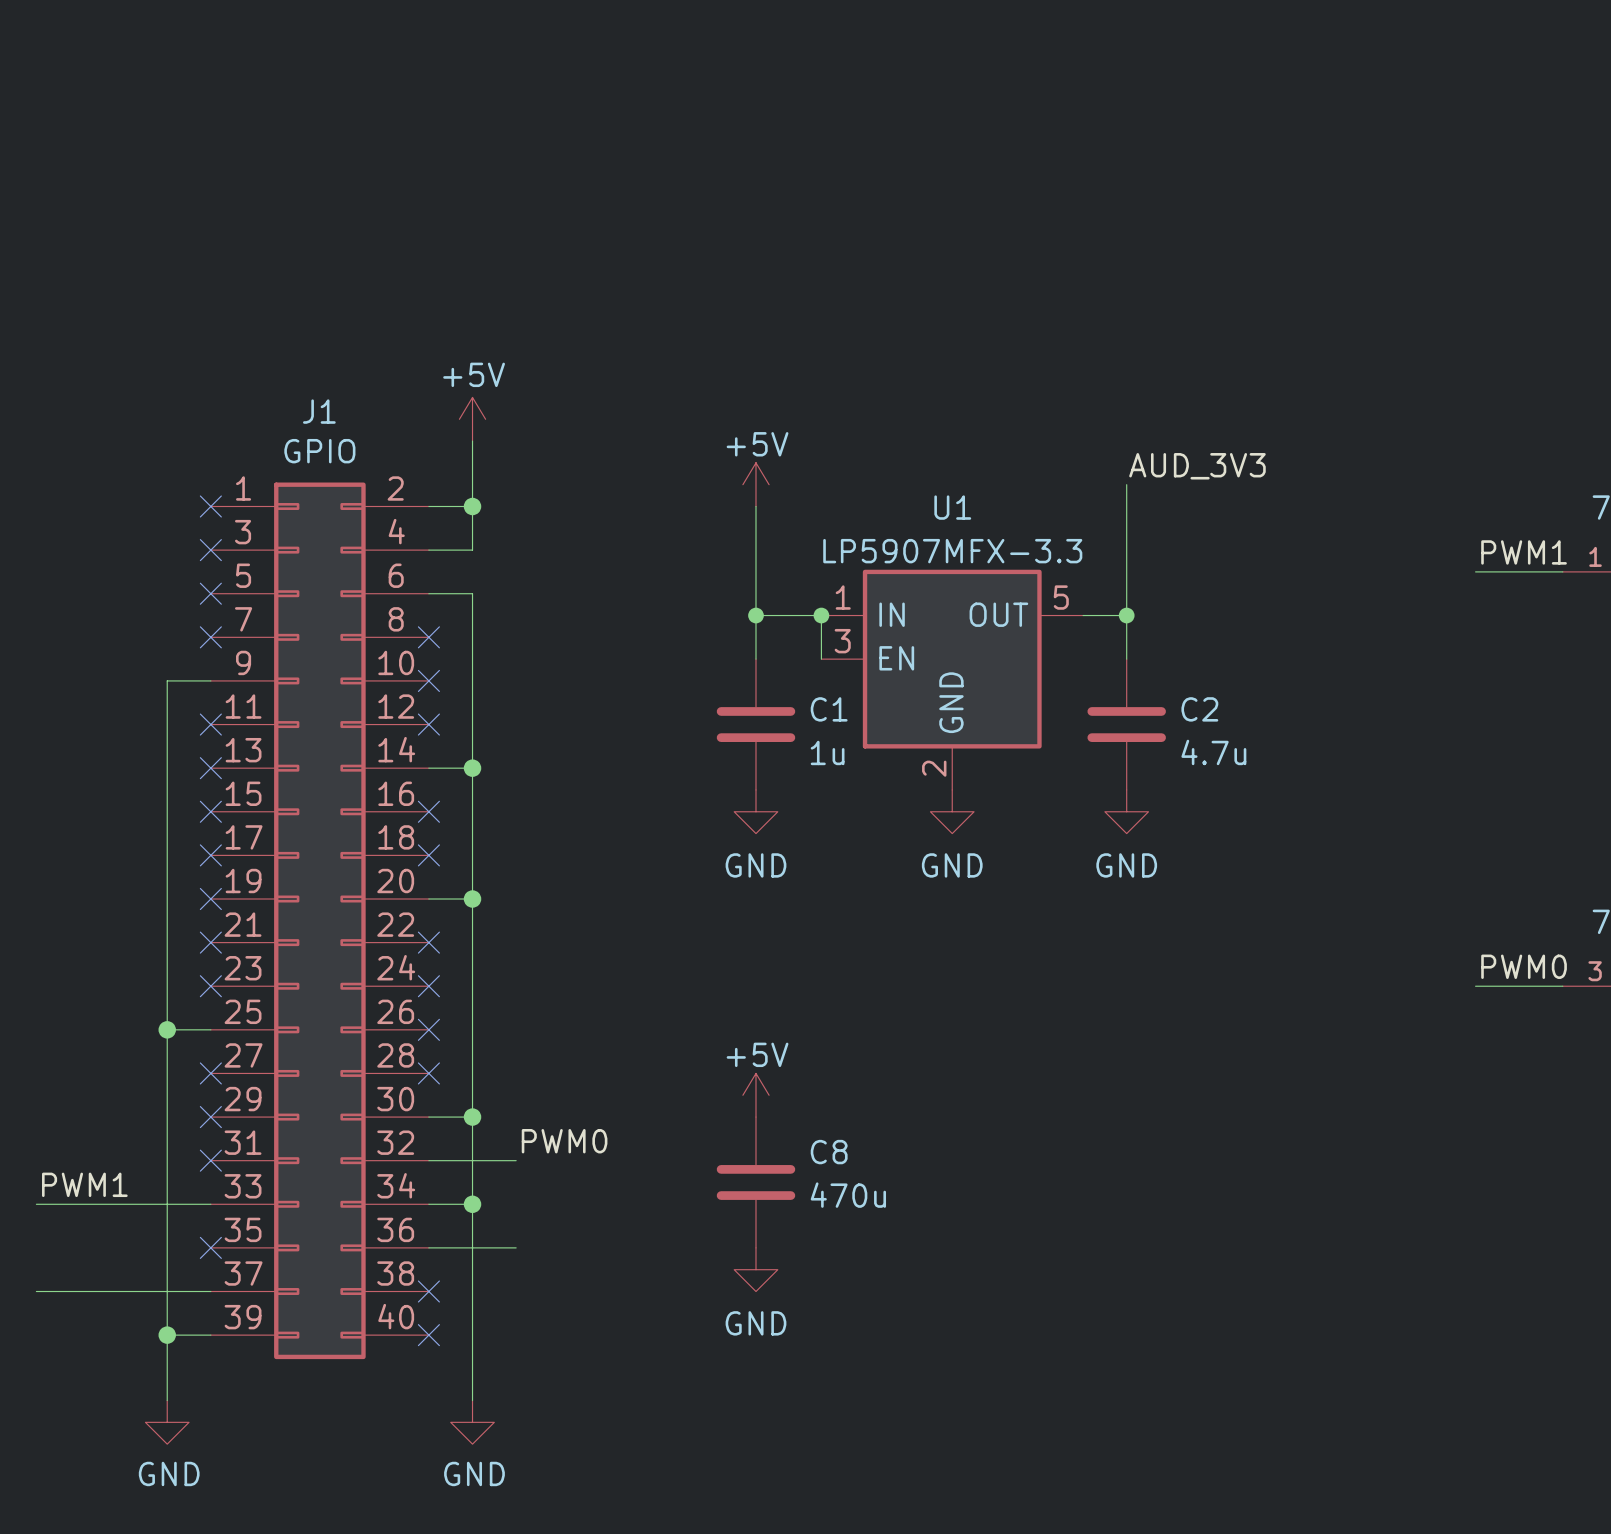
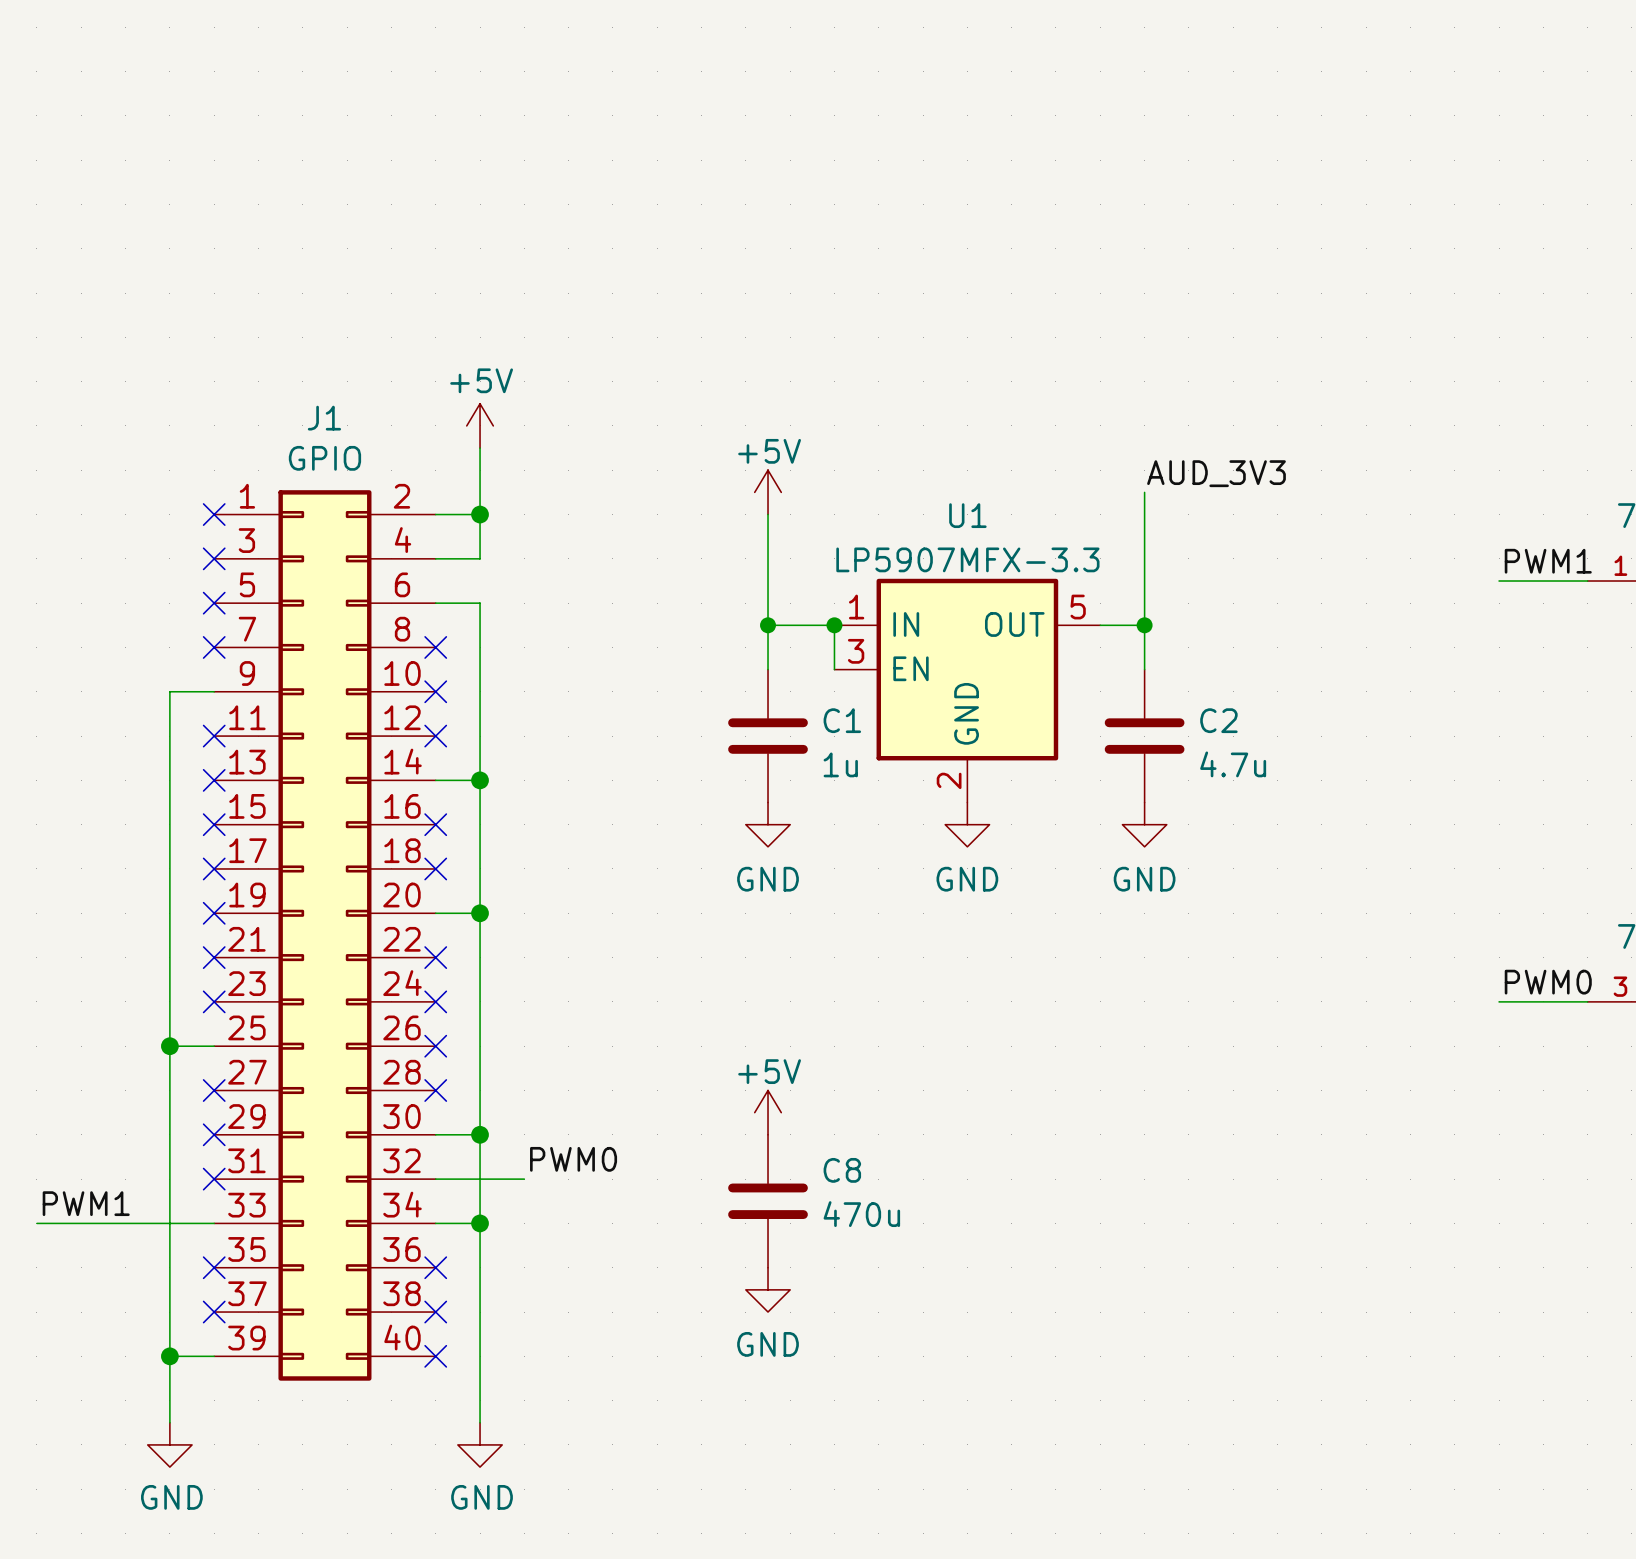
wire: (428, 1247) (516, 1247) -> none
no-connect mark: none -> (435, 1267)
wire: (36, 1291) (210, 1291) -> none
no-connect mark: none -> (214, 1312)

